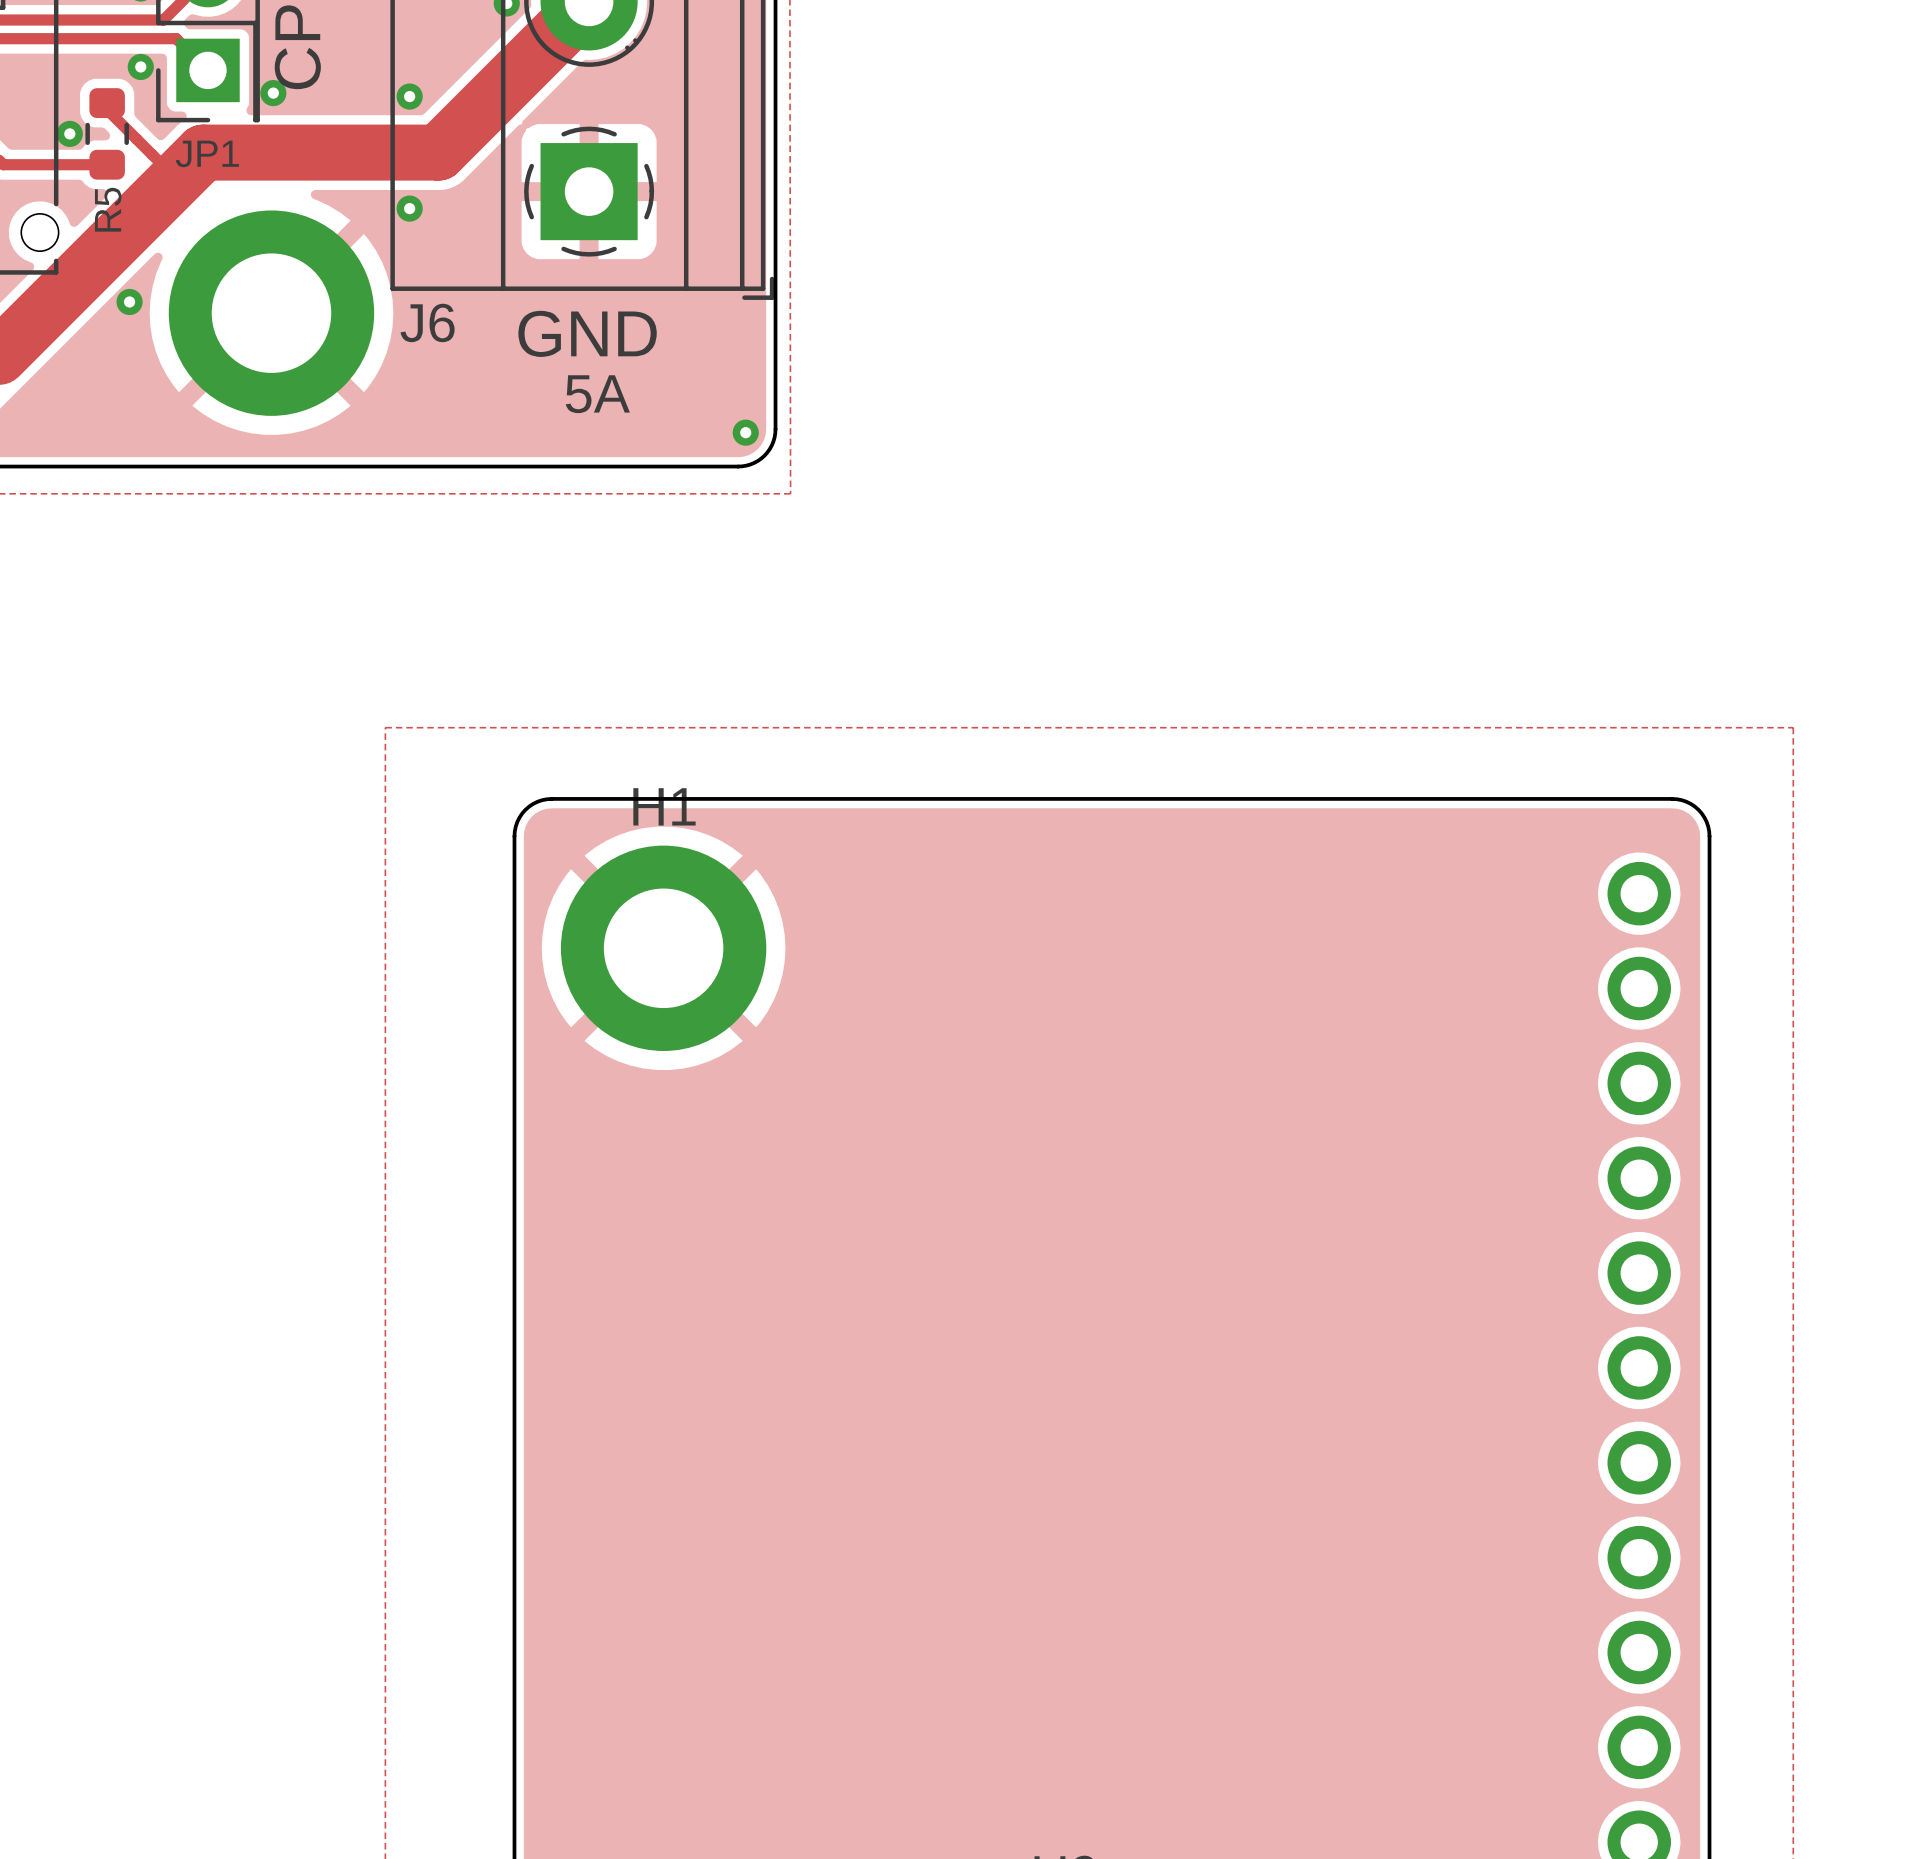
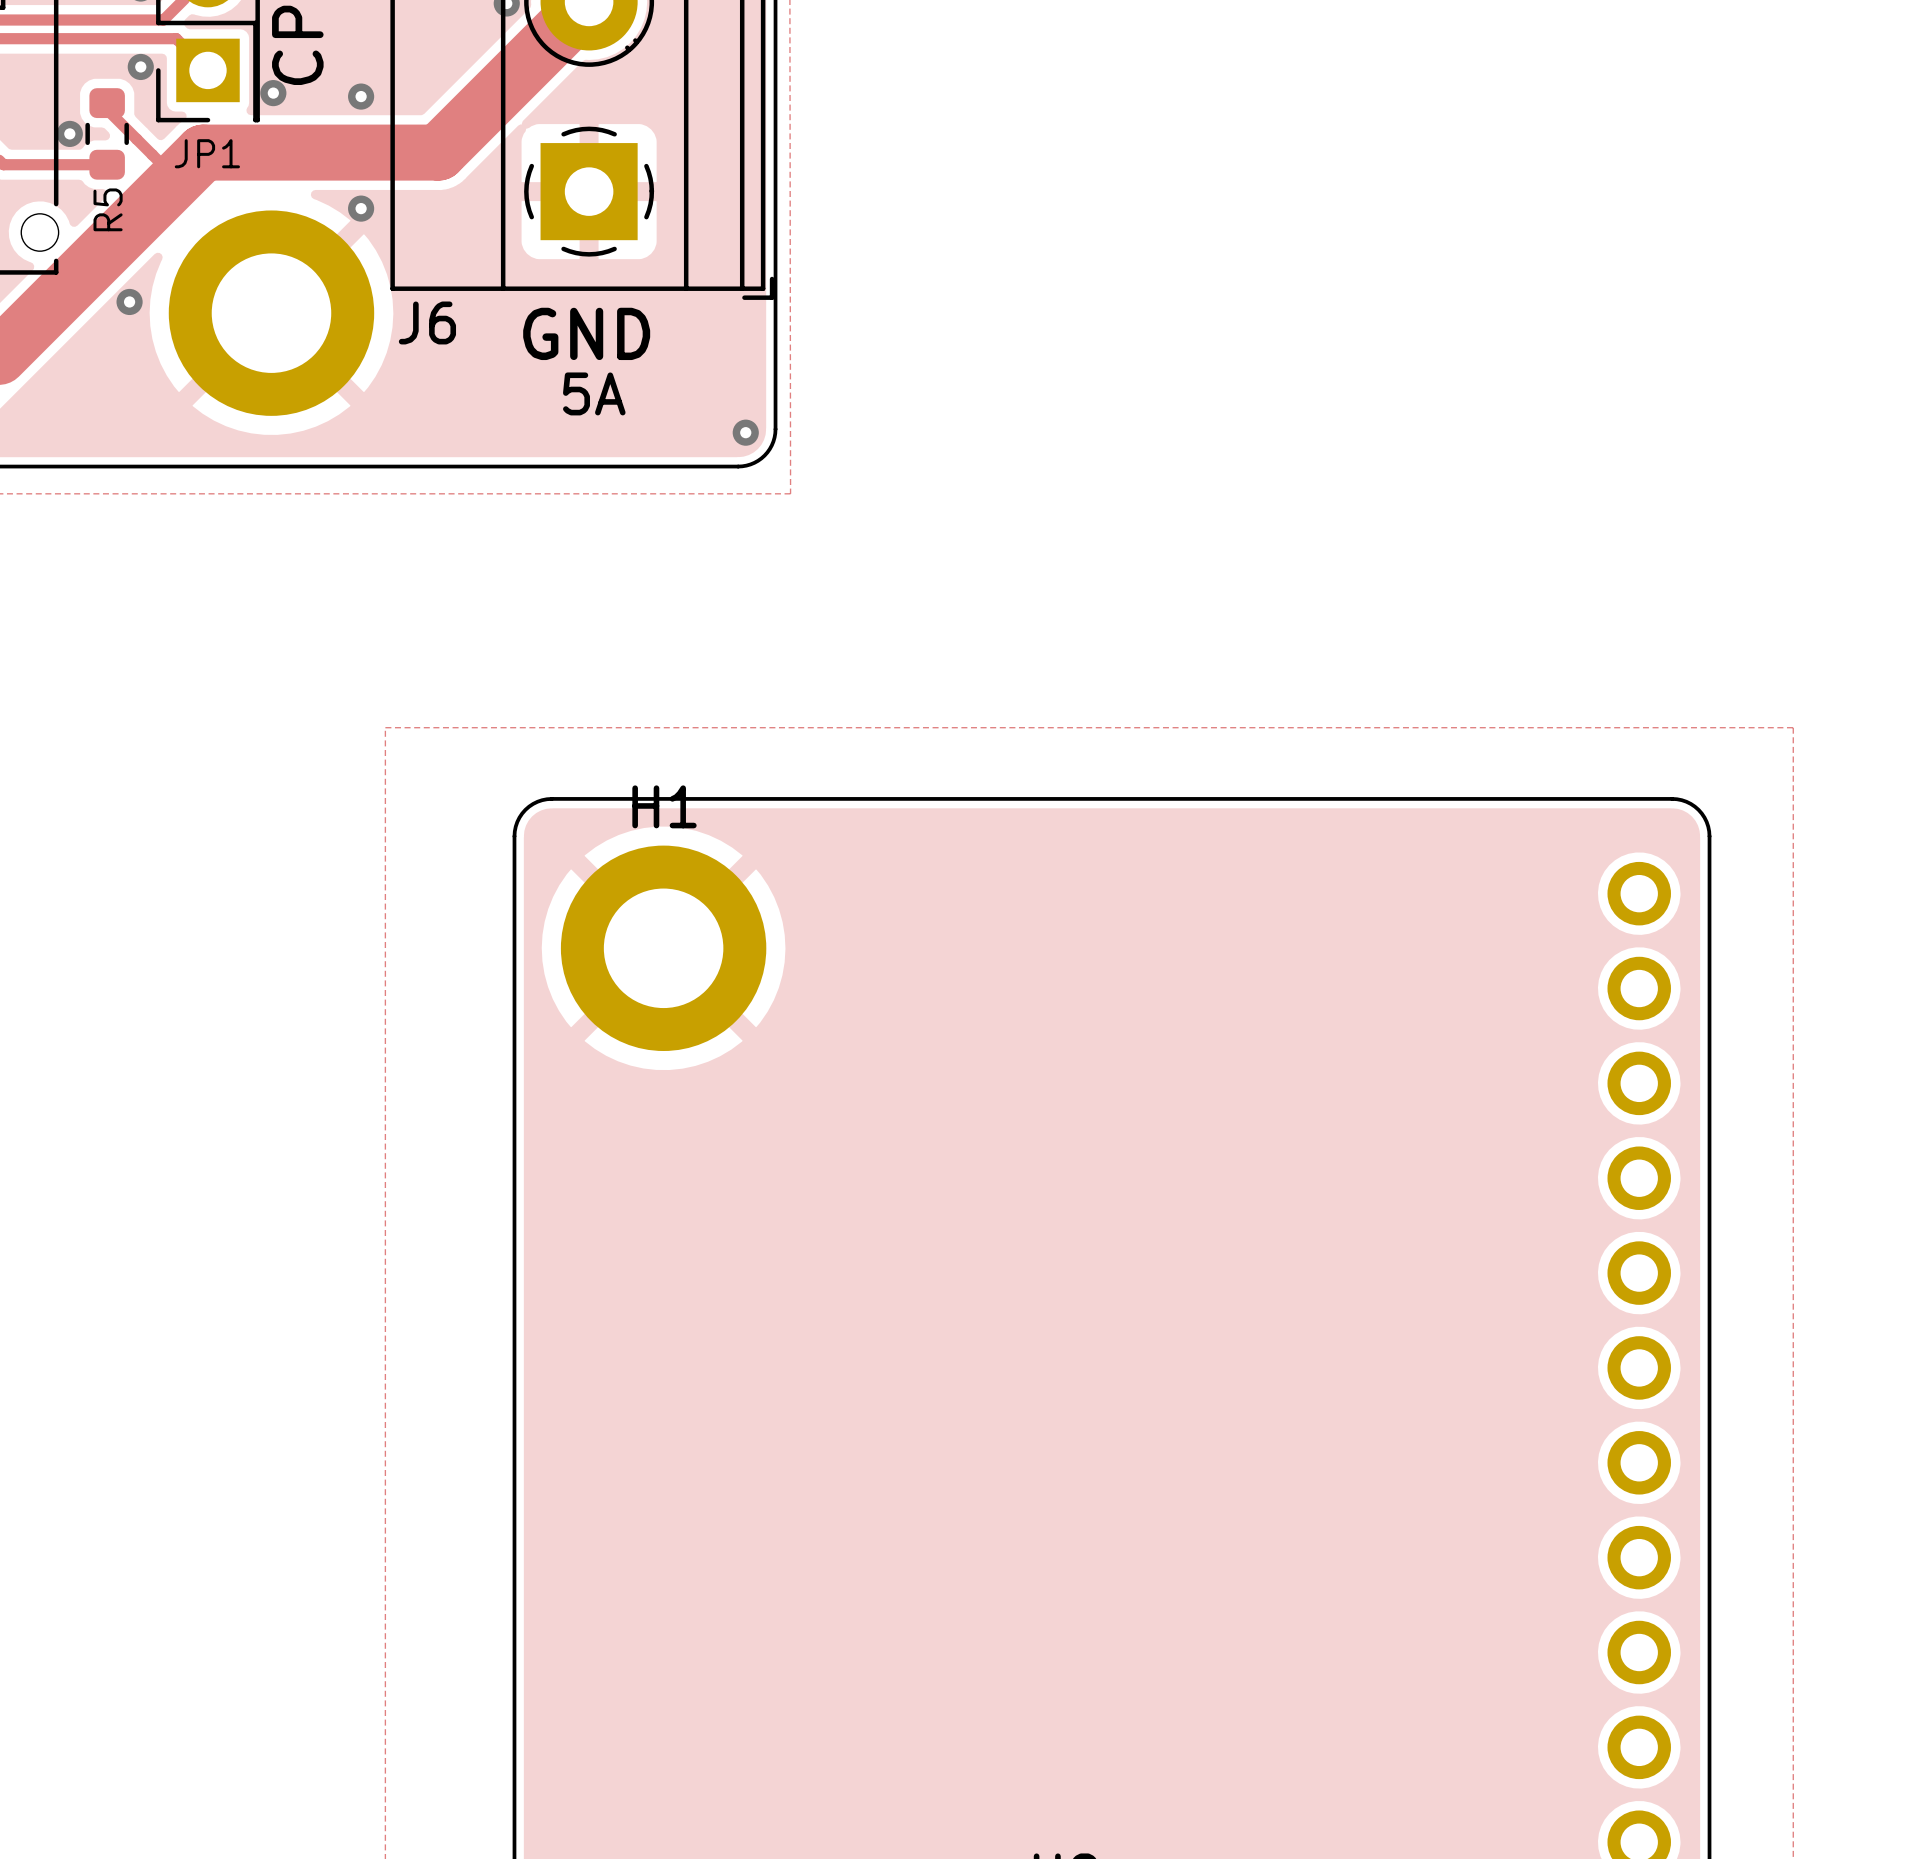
via position: (409, 96) -> (361, 96)
via position: (409, 208) -> (361, 208)

